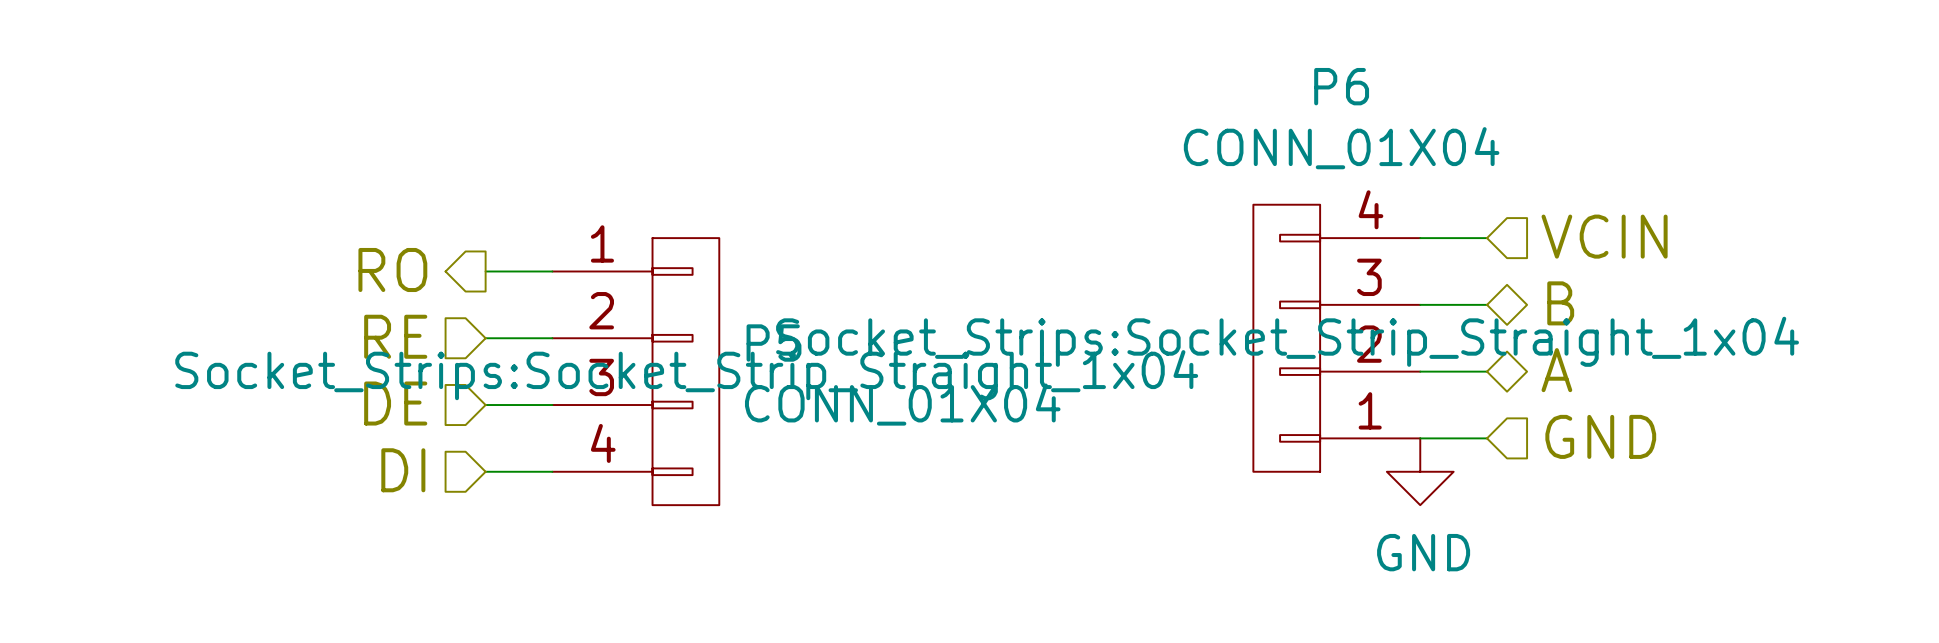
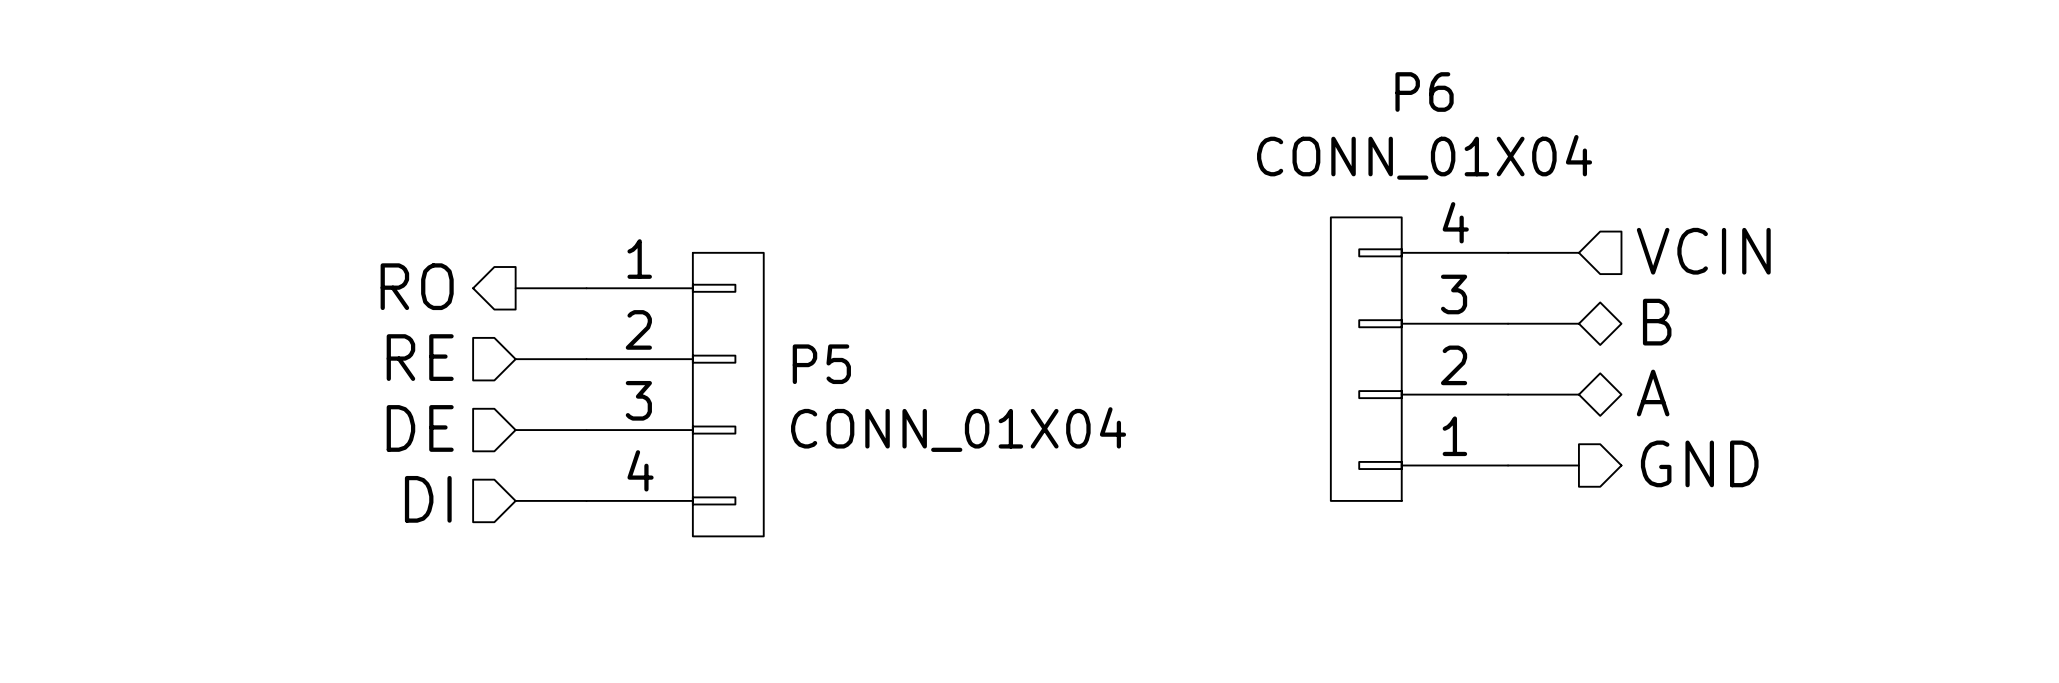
P6 text: Socket_Strips:Socket_Strip_Straight_1x04 (1287, 341) -> none
P5 text: Socket_Strips:Socket_Strip_Straight_1x04 (686, 375) -> none
hierarchical label shape: input (1600, 436) -> output (1699, 463)
power symbol: GND (1420, 471) -> none

